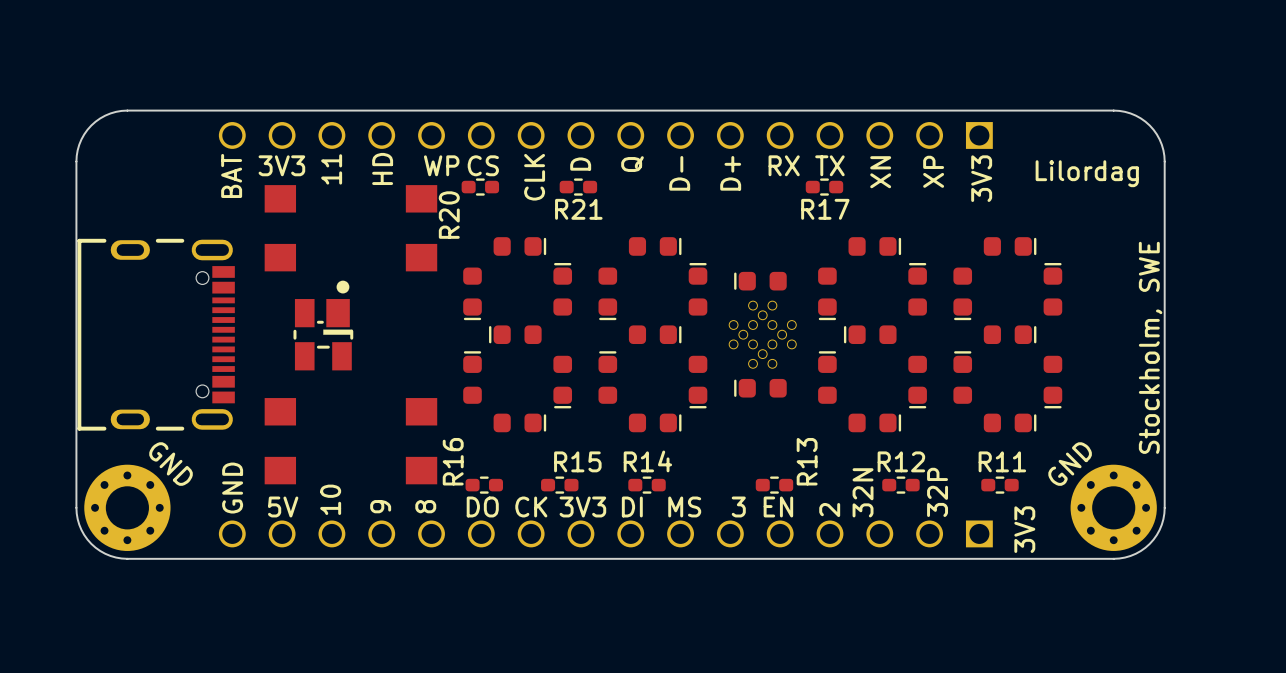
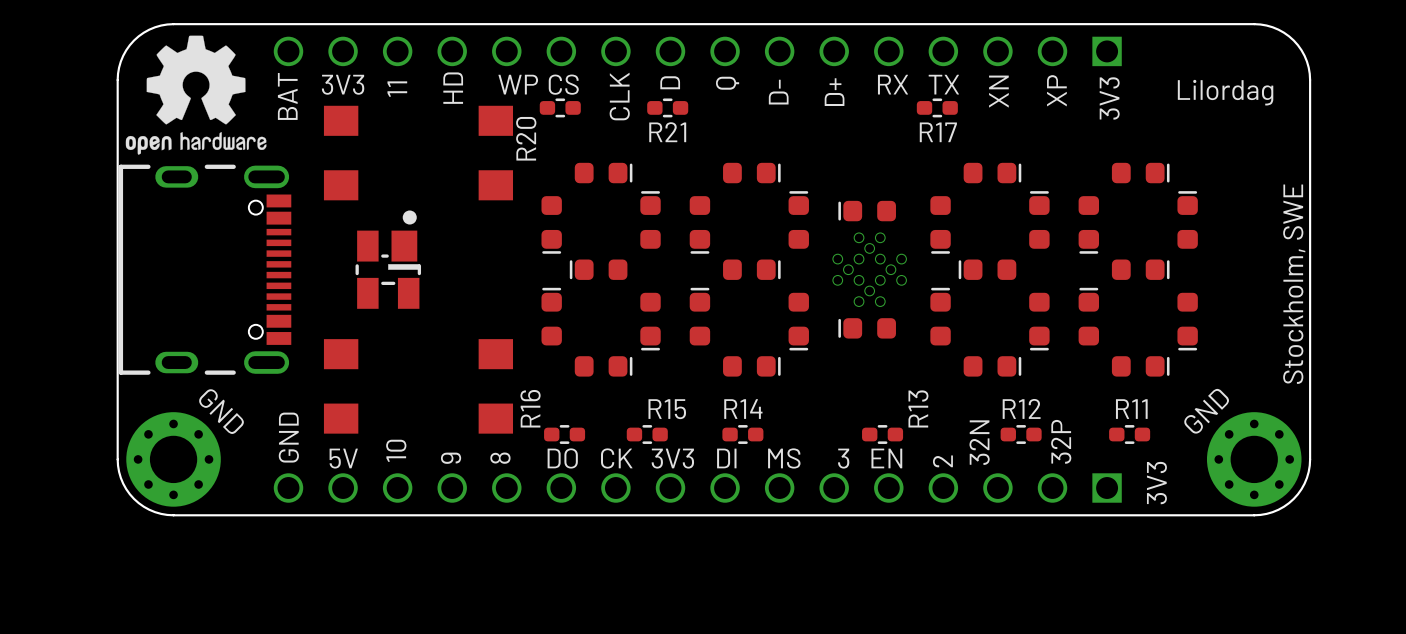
drawing: none -> [125, 35, 267, 155]

